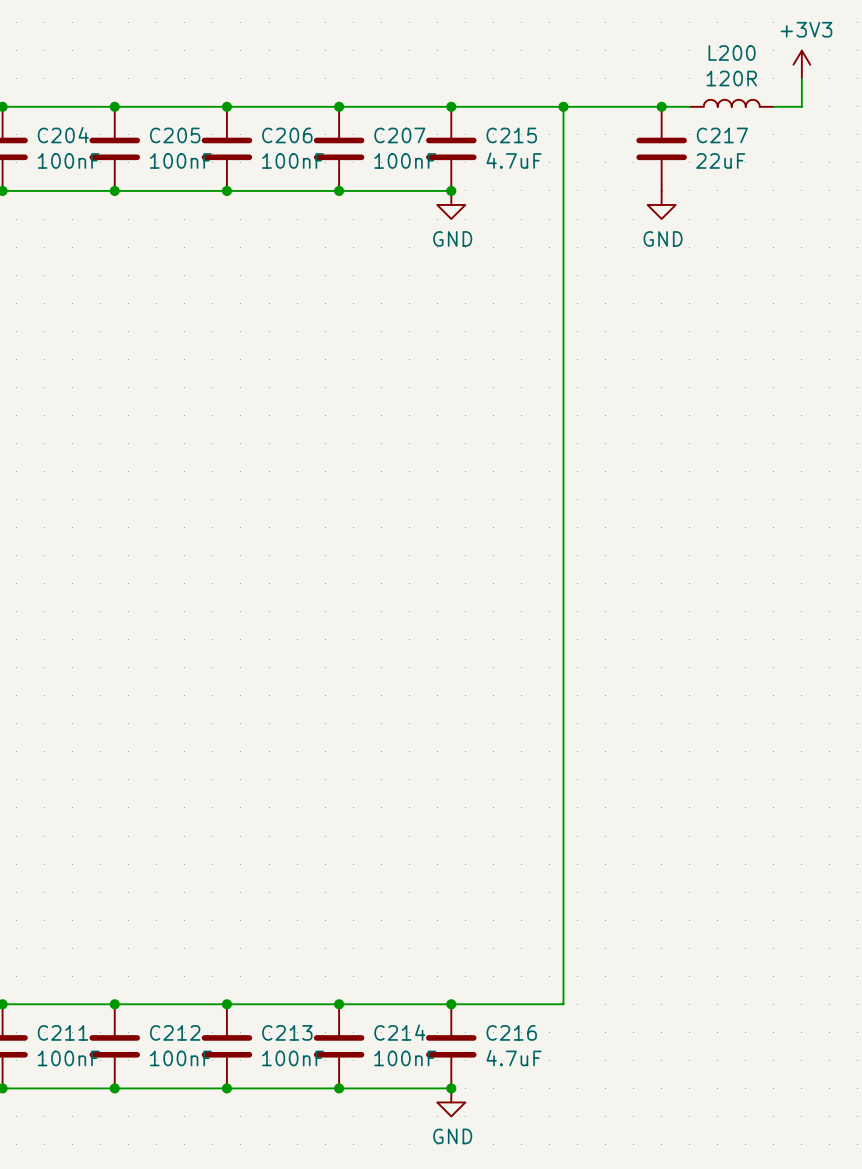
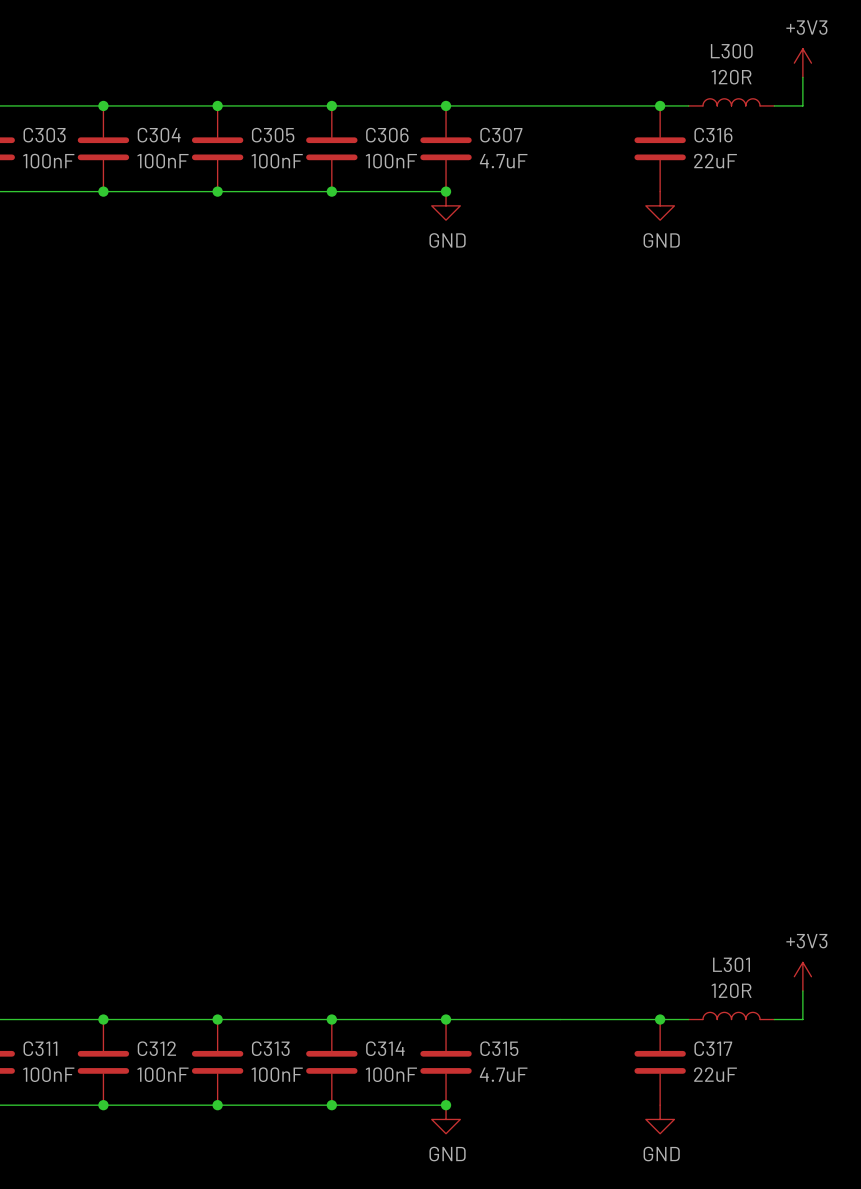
L200 name: L200 (732, 53) -> L300 (731, 51)
wire: (563, 106) (563, 1004) -> (688, 1019) (560, 1019)
junction: (563, 106) -> none
C204 name: C204 (63, 135) -> C303 (44, 135)
C205 name: C205 (175, 135) -> C304 (159, 135)
C206 name: C206 (287, 135) -> C305 (273, 135)
C207 name: C207 (399, 135) -> C306 (387, 135)
C215 name: C215 (511, 135) -> C307 (501, 135)
C217 name: C217 (722, 135) -> C316 (713, 135)
power symbol: none -> +3V3 (802, 976)
wire: none -> (802, 990) (802, 1019) (774, 1019)
L301: none -> 120R (731, 1015)
junction: none -> (660, 1019)
C211 name: C211 (62, 1032) -> C311 (40, 1048)
C212 name: C212 (175, 1032) -> C312 (156, 1048)
C213 name: C213 (287, 1032) -> C313 (270, 1048)
C214 name: C214 (399, 1032) -> C314 (385, 1048)
C216 name: C216 (511, 1032) -> C315 (499, 1048)
C317: none -> 22uF (660, 1062)
power symbol: none -> GND (660, 1119)

